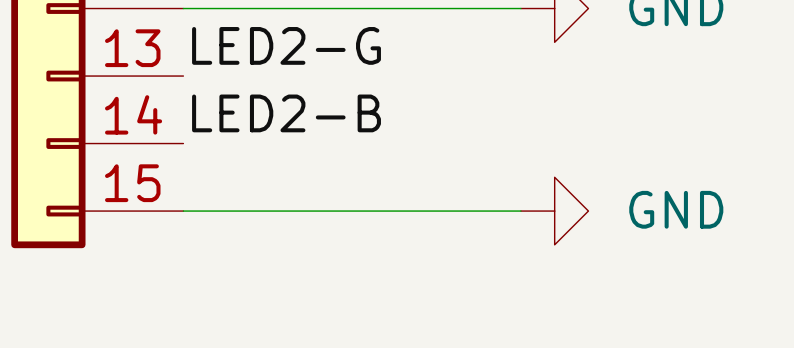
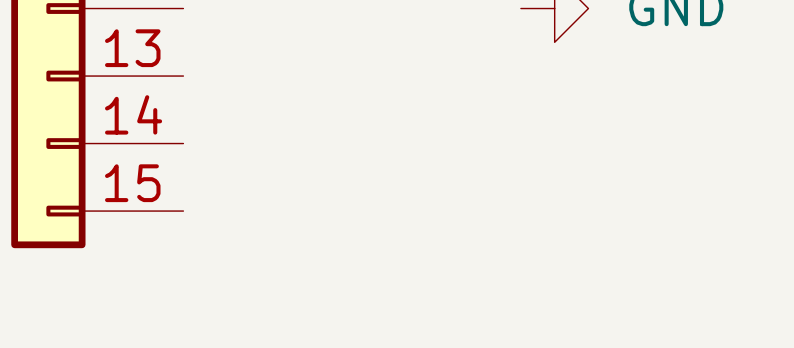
wire: (183, 8) (520, 8) -> none
label: LED2-G (286, 45) -> none
label: LED2-B (286, 113) -> none
wire: (183, 211) (520, 211) -> none
power symbol: GND (554, 211) -> none

